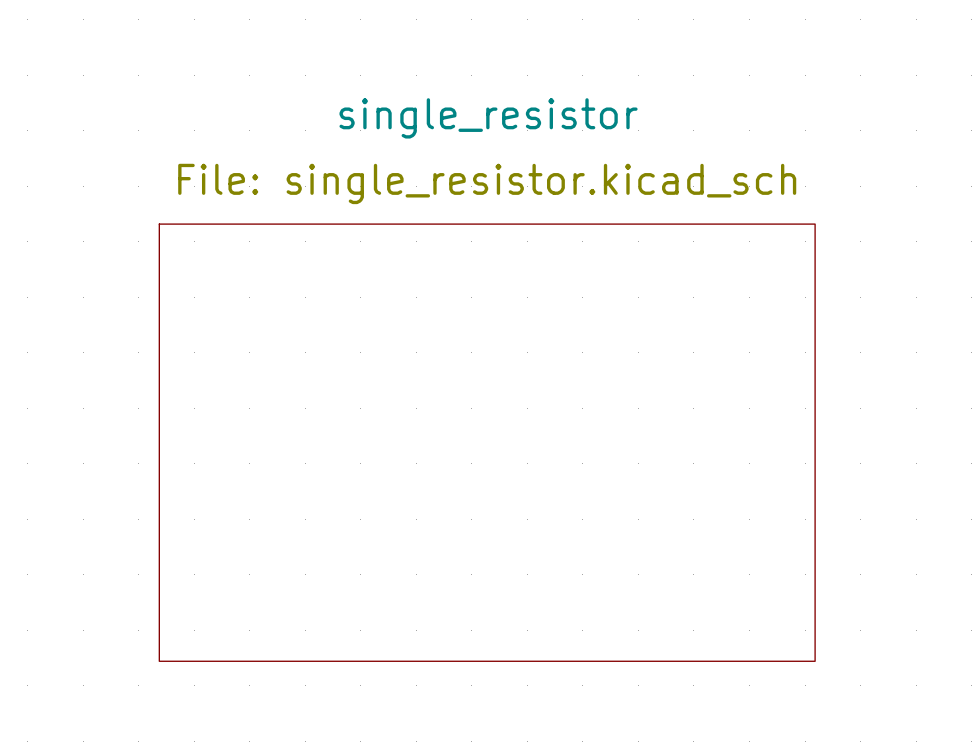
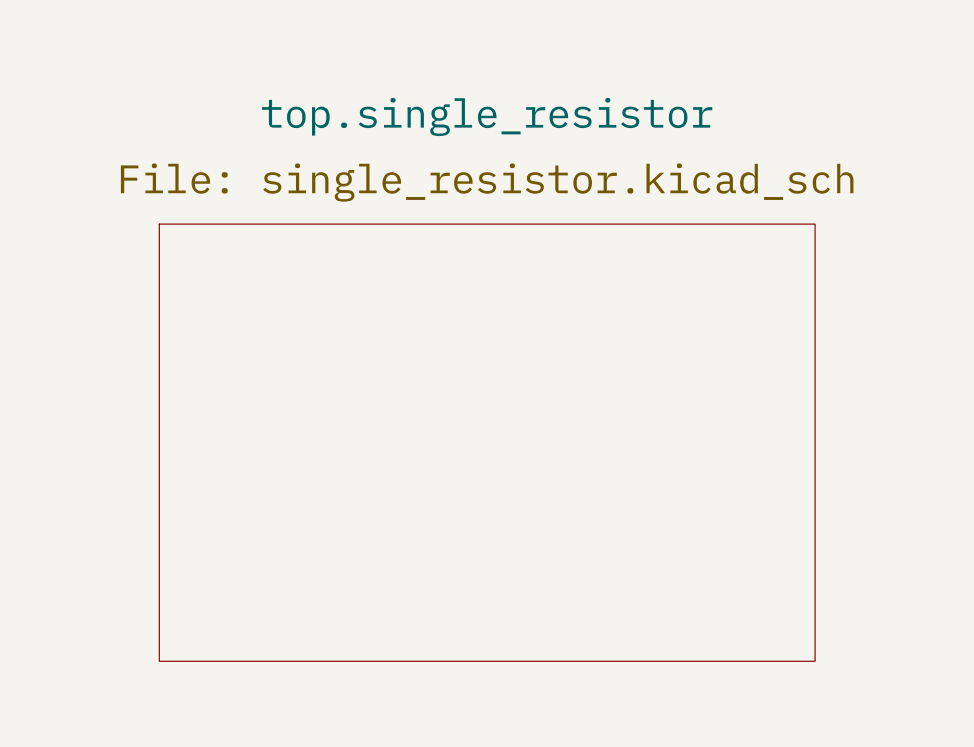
sheet single_resistor name: single_resistor (488, 118) -> top.single_resistor (487, 116)

